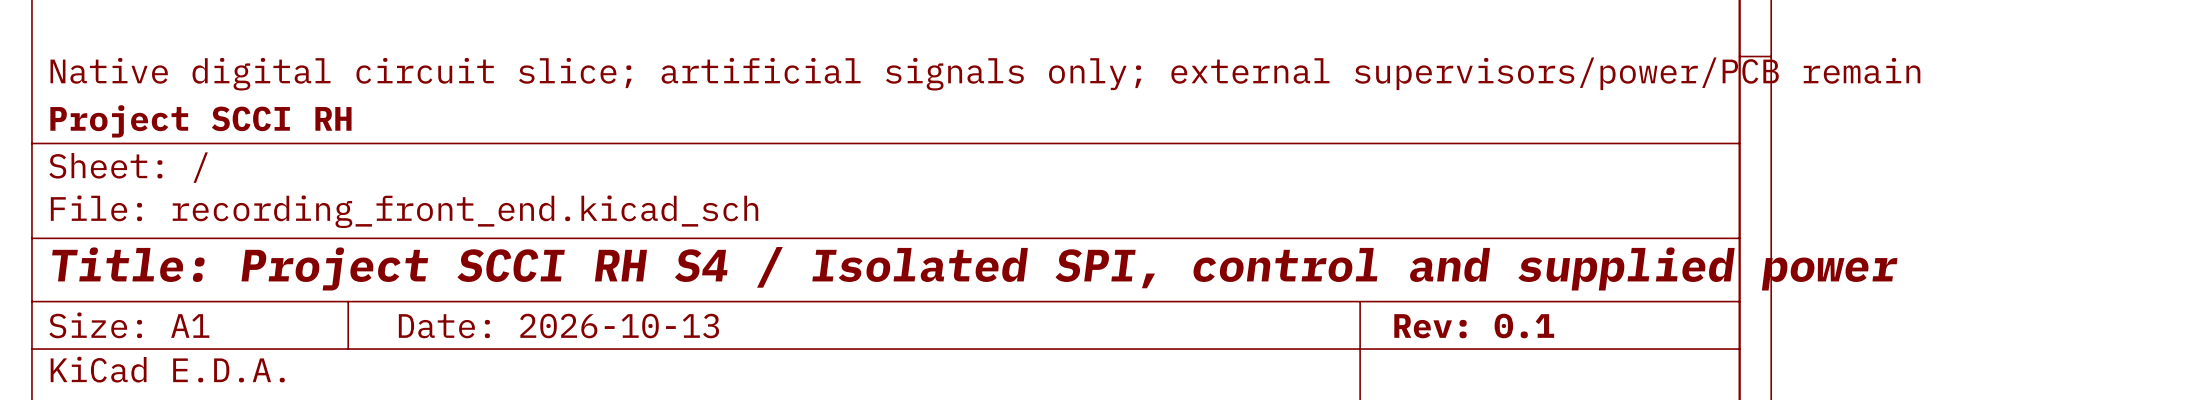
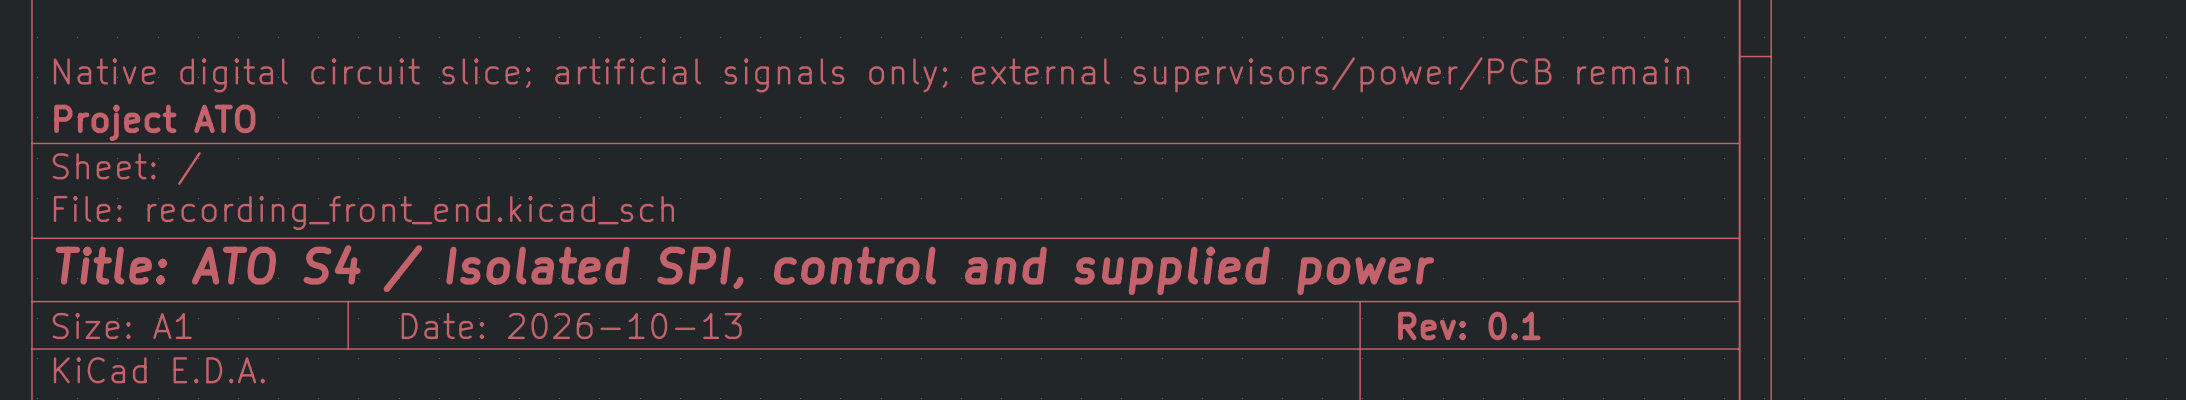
title block: Project SCCI RH (200, 121) -> Project ATO (154, 122)
title block: Title: Project SCCI RH S4 / Isolated SPI, control and supplied power (974, 268) -> Title: ATO S4 / Isolated SPI, control and supplied power (744, 270)

